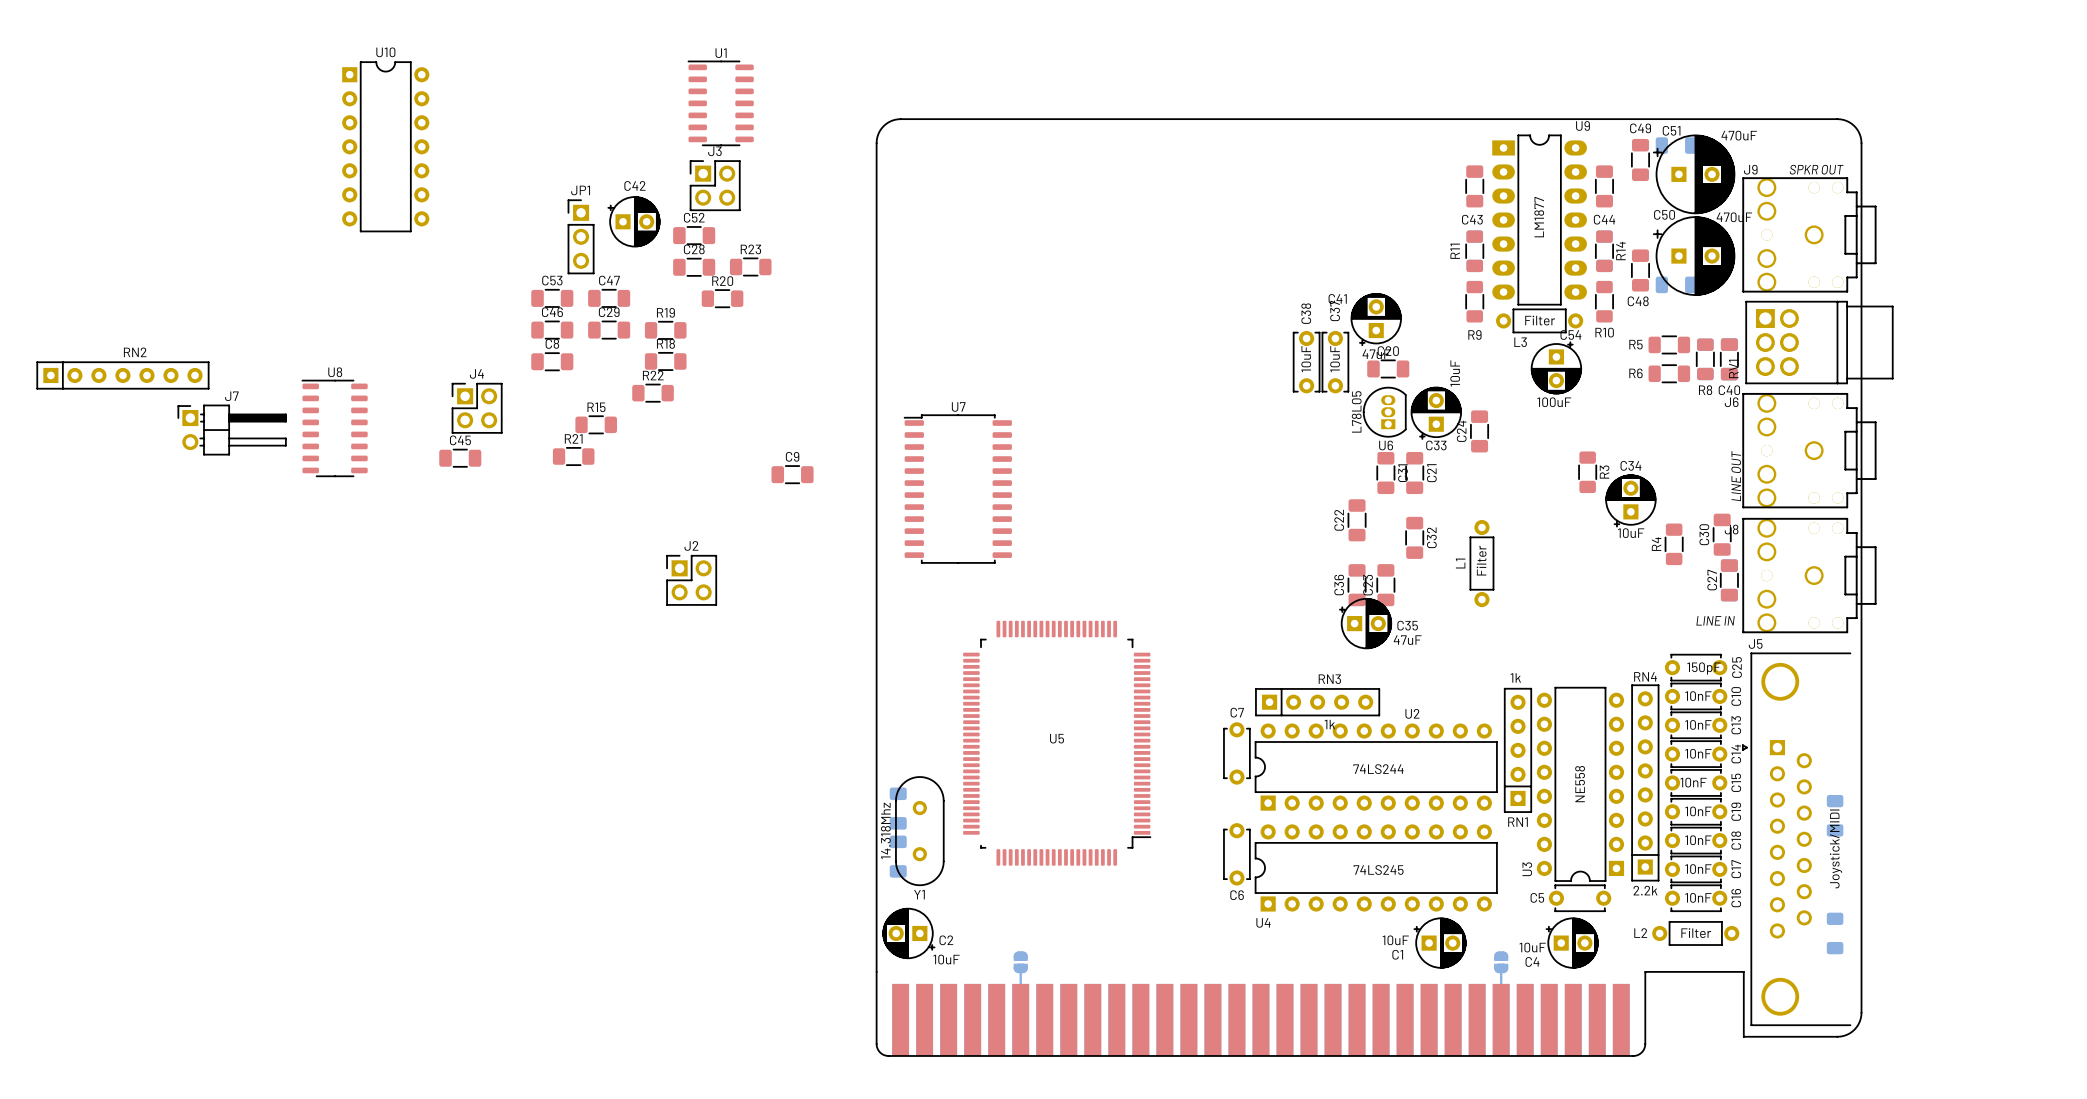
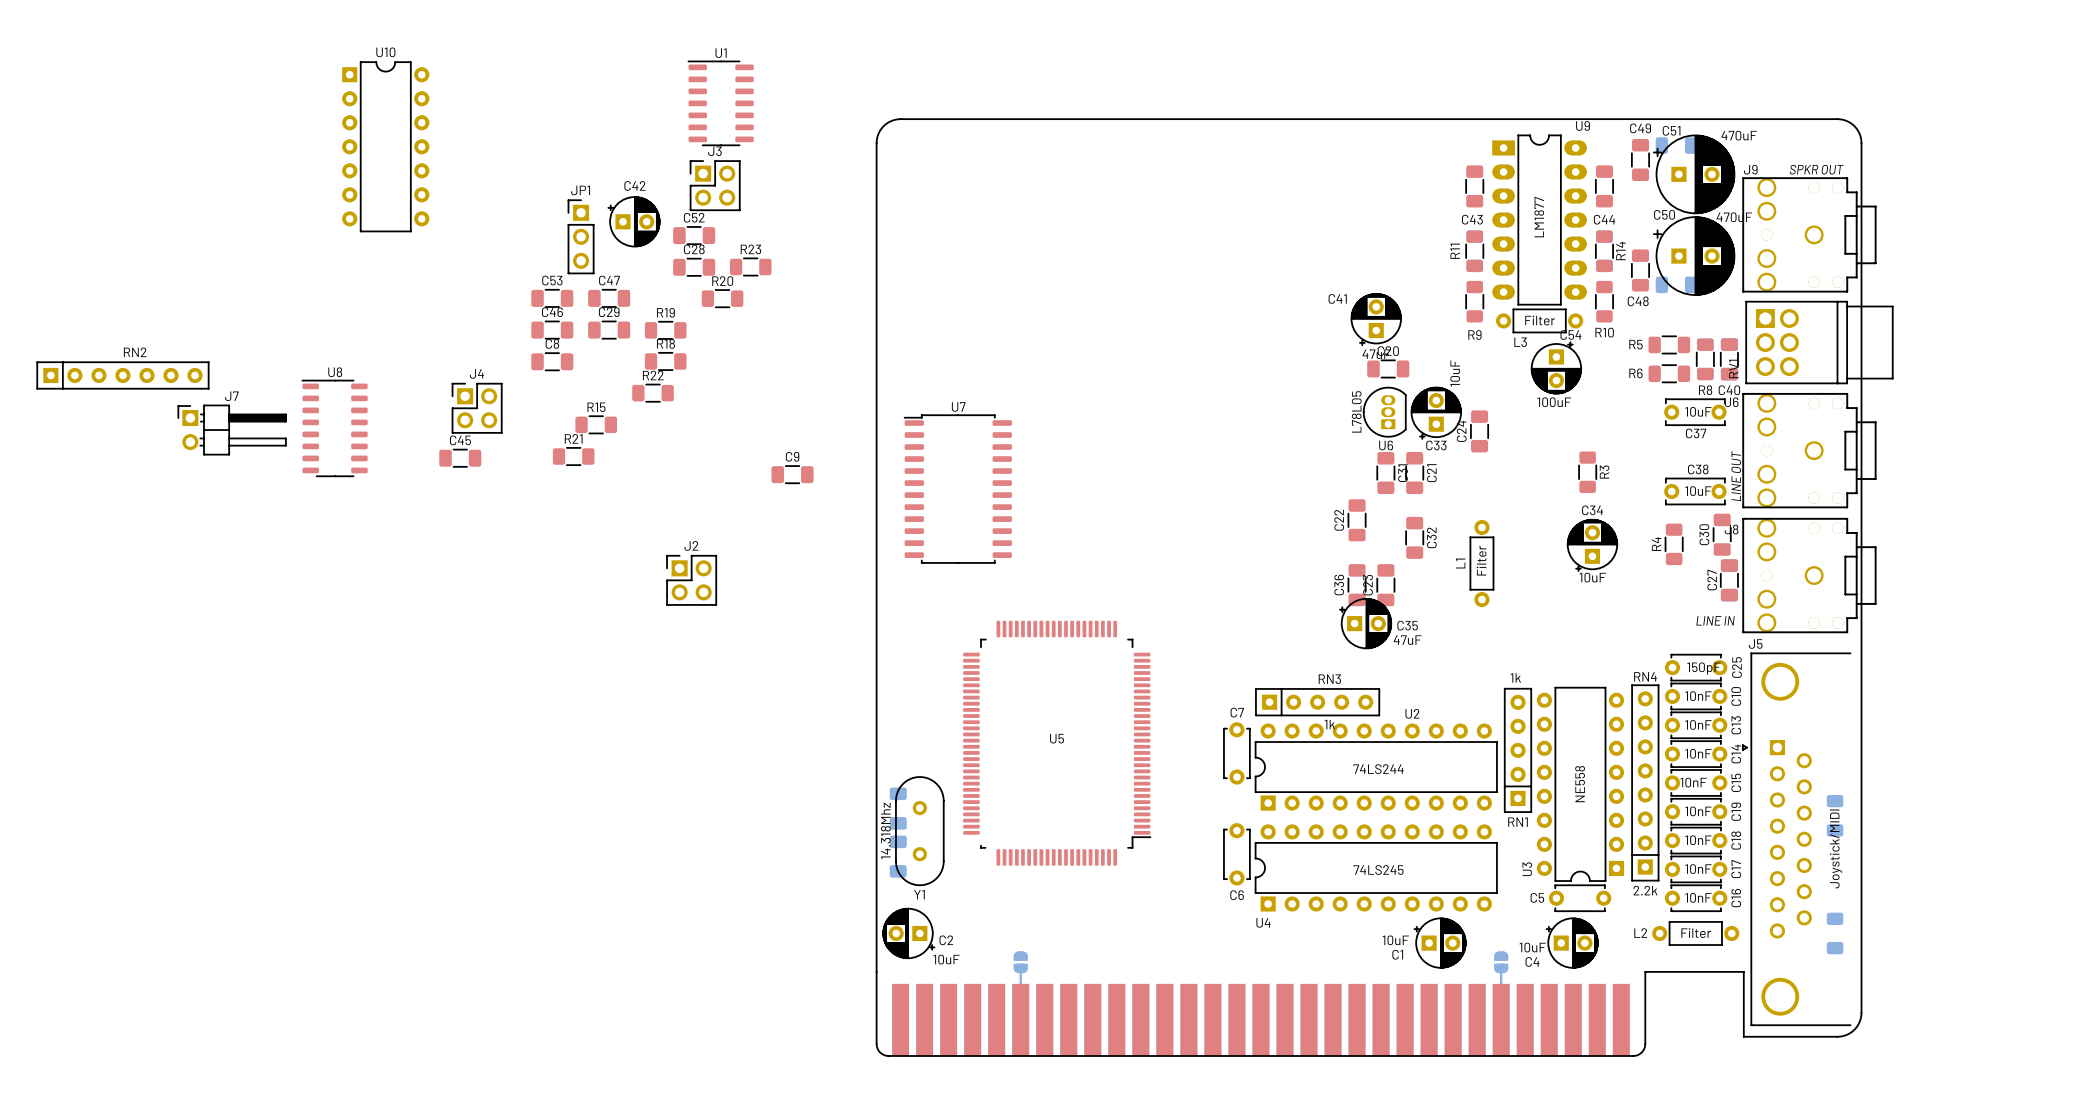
C37 name position: C37 (1335, 310) -> C37 (1696, 433)
C38 name position: C38 (1306, 313) -> C38 (1698, 469)
C38 rotation: 0° (1306, 362) -> 90° clockwise (1695, 491)
C38 position: (1306, 362) -> (1695, 491)
C37 rotation: 0° (1335, 362) -> 90° clockwise (1695, 412)
C37 position: (1335, 362) -> (1695, 412)
C34 position: (1630, 500) -> (1592, 545)

